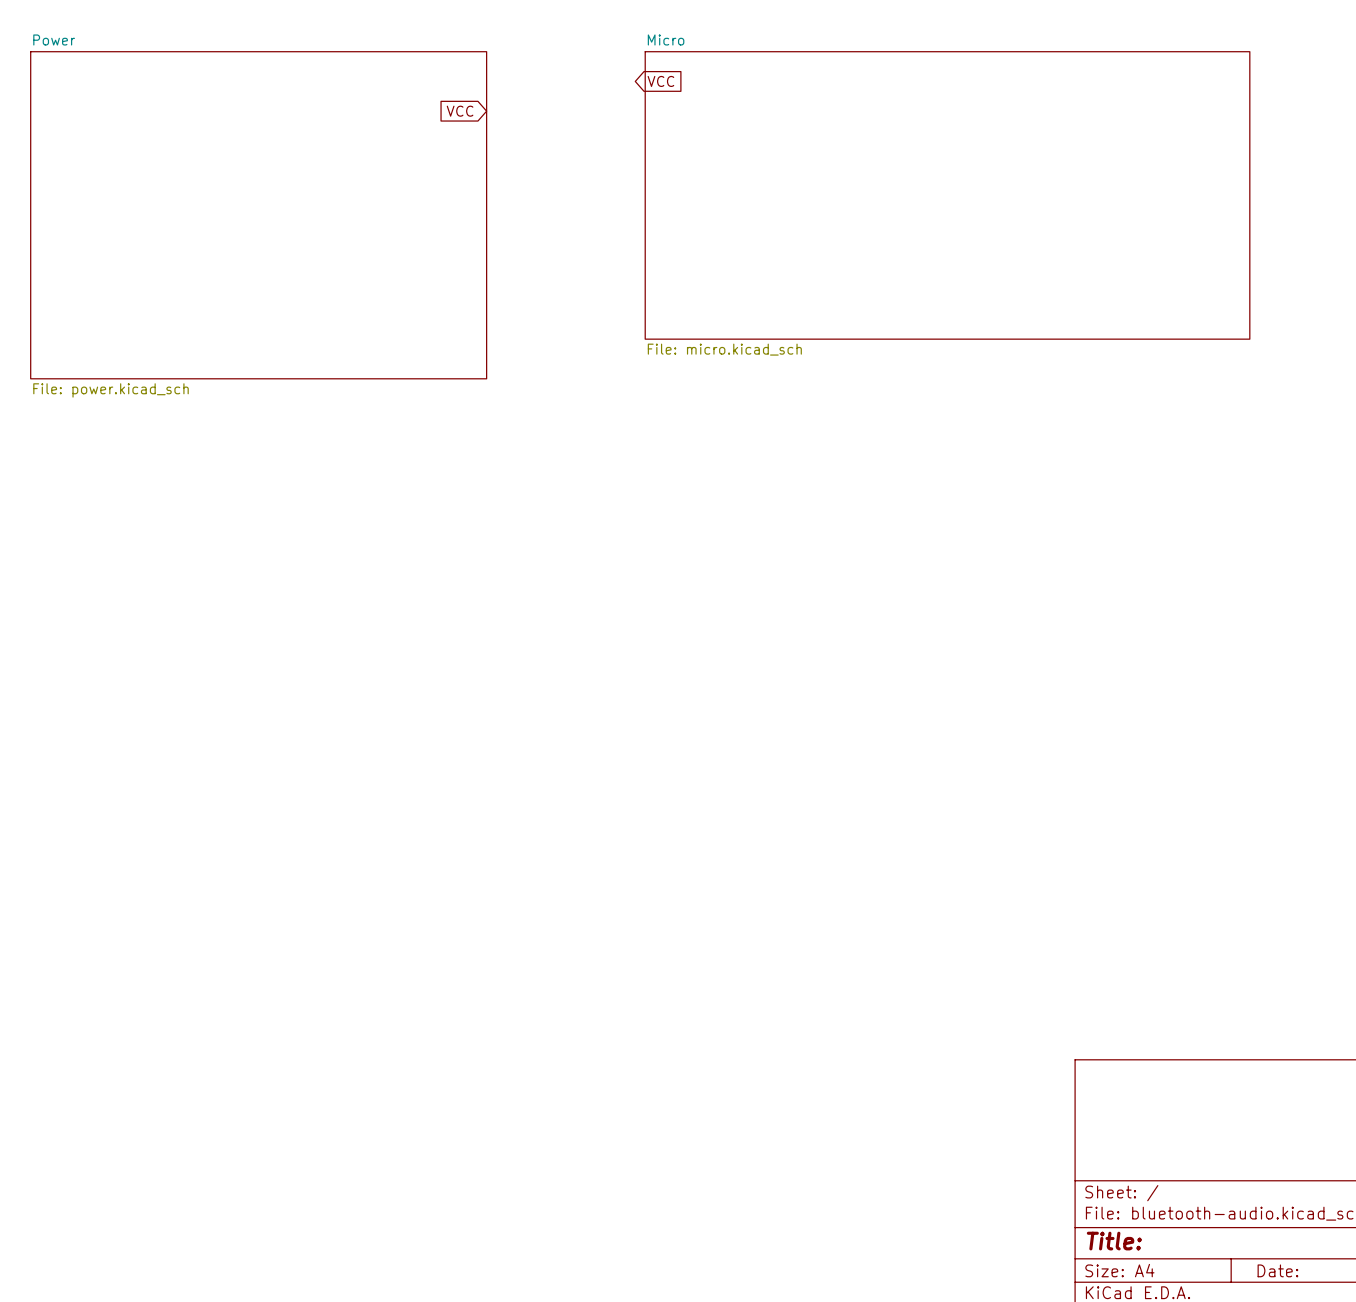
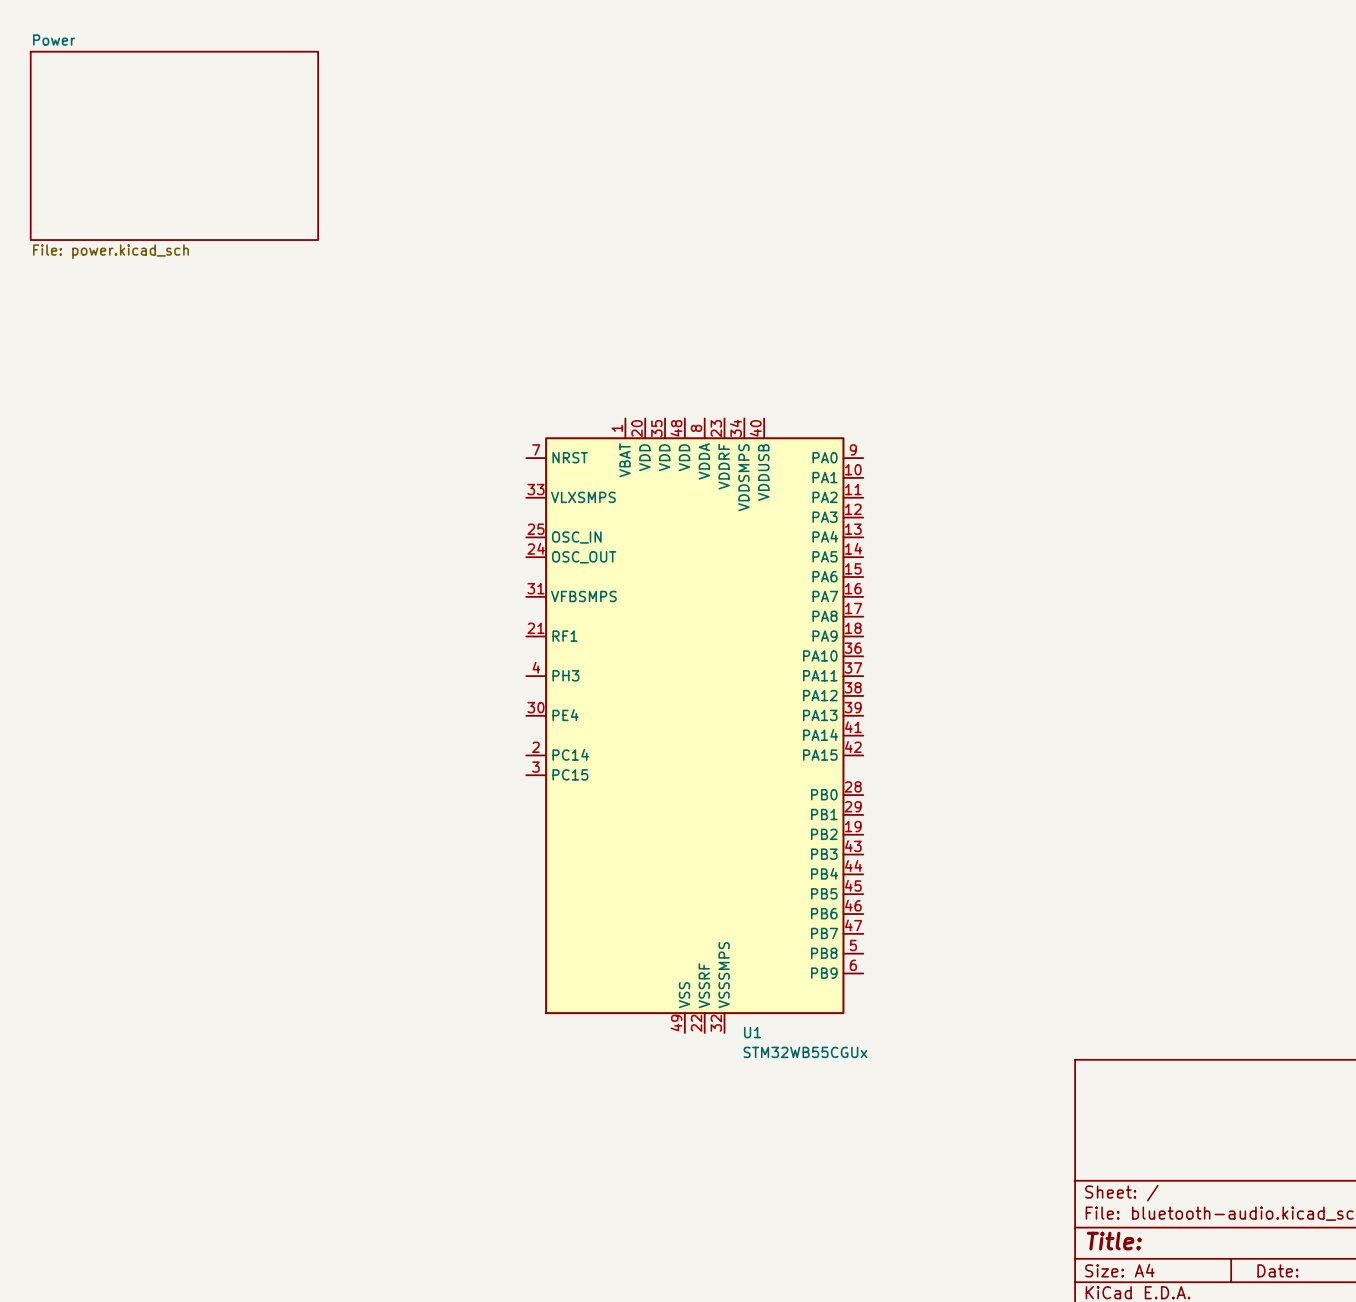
global label: VCC (660, 81) -> none
global label: VCC (460, 111) -> none
sheet Power: none -> File: power.kicad_sch (174, 145)
sheet Micro: File: micro.kicad_sch (947, 195) -> none
sheet Power: File: power.kicad_sch (258, 215) -> none
U1: none -> STM32WB55CGUx (694, 725)

